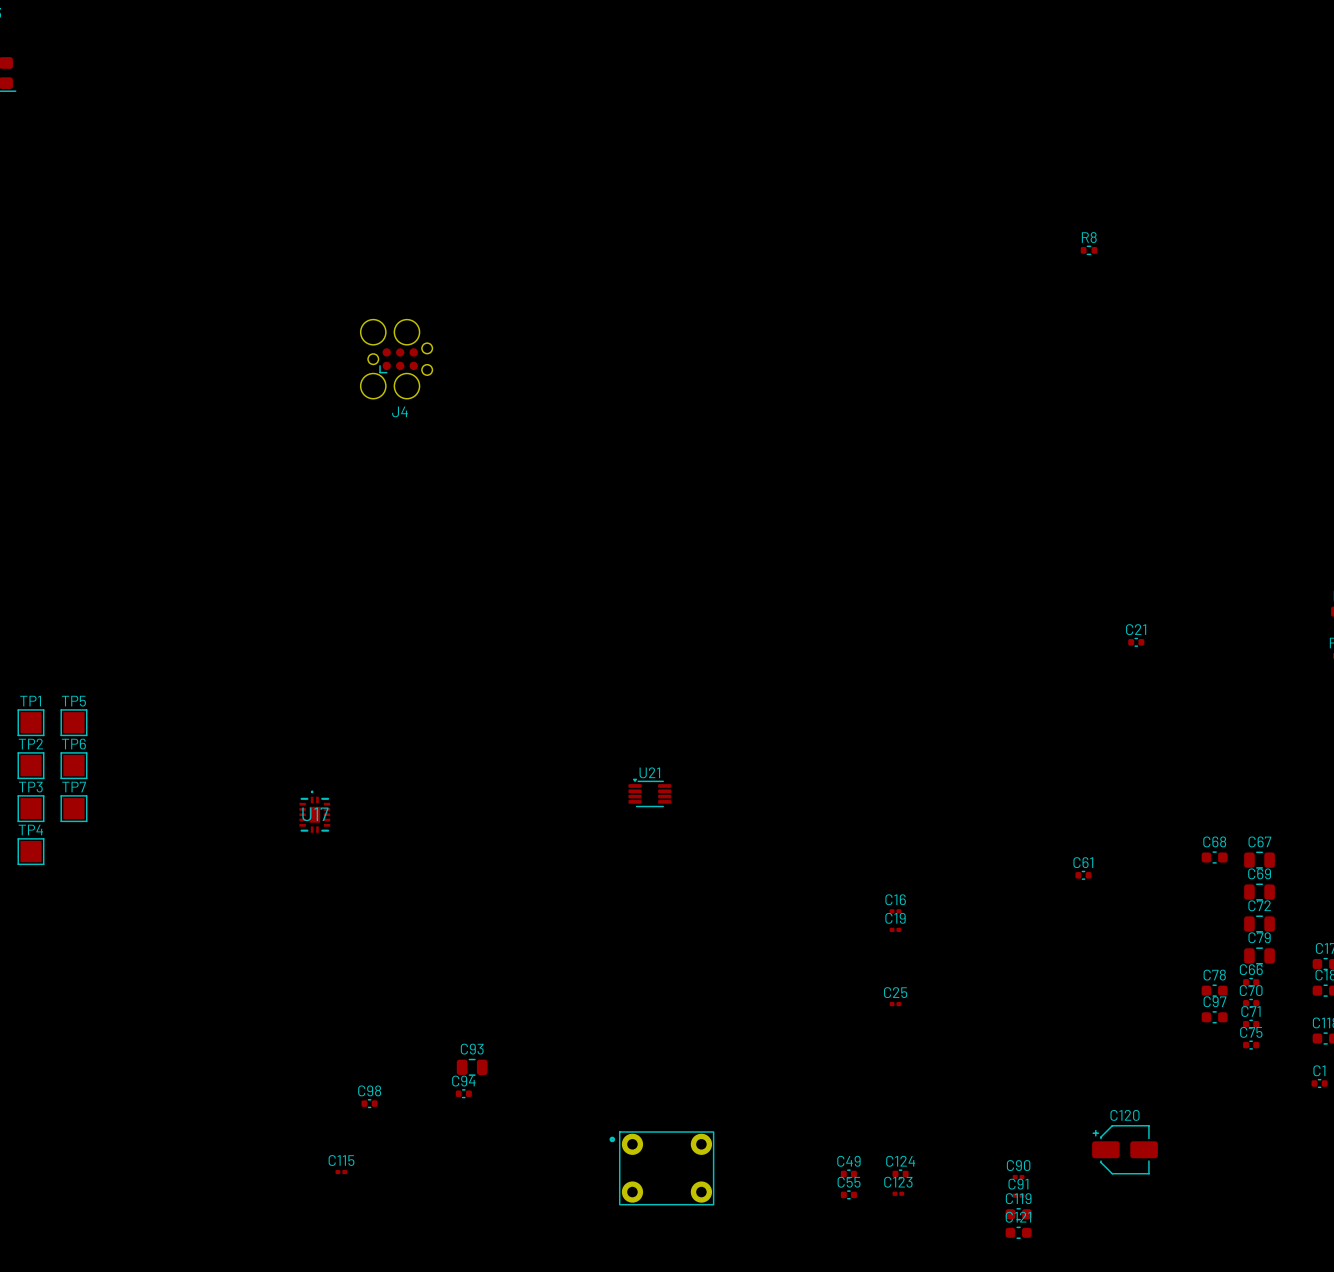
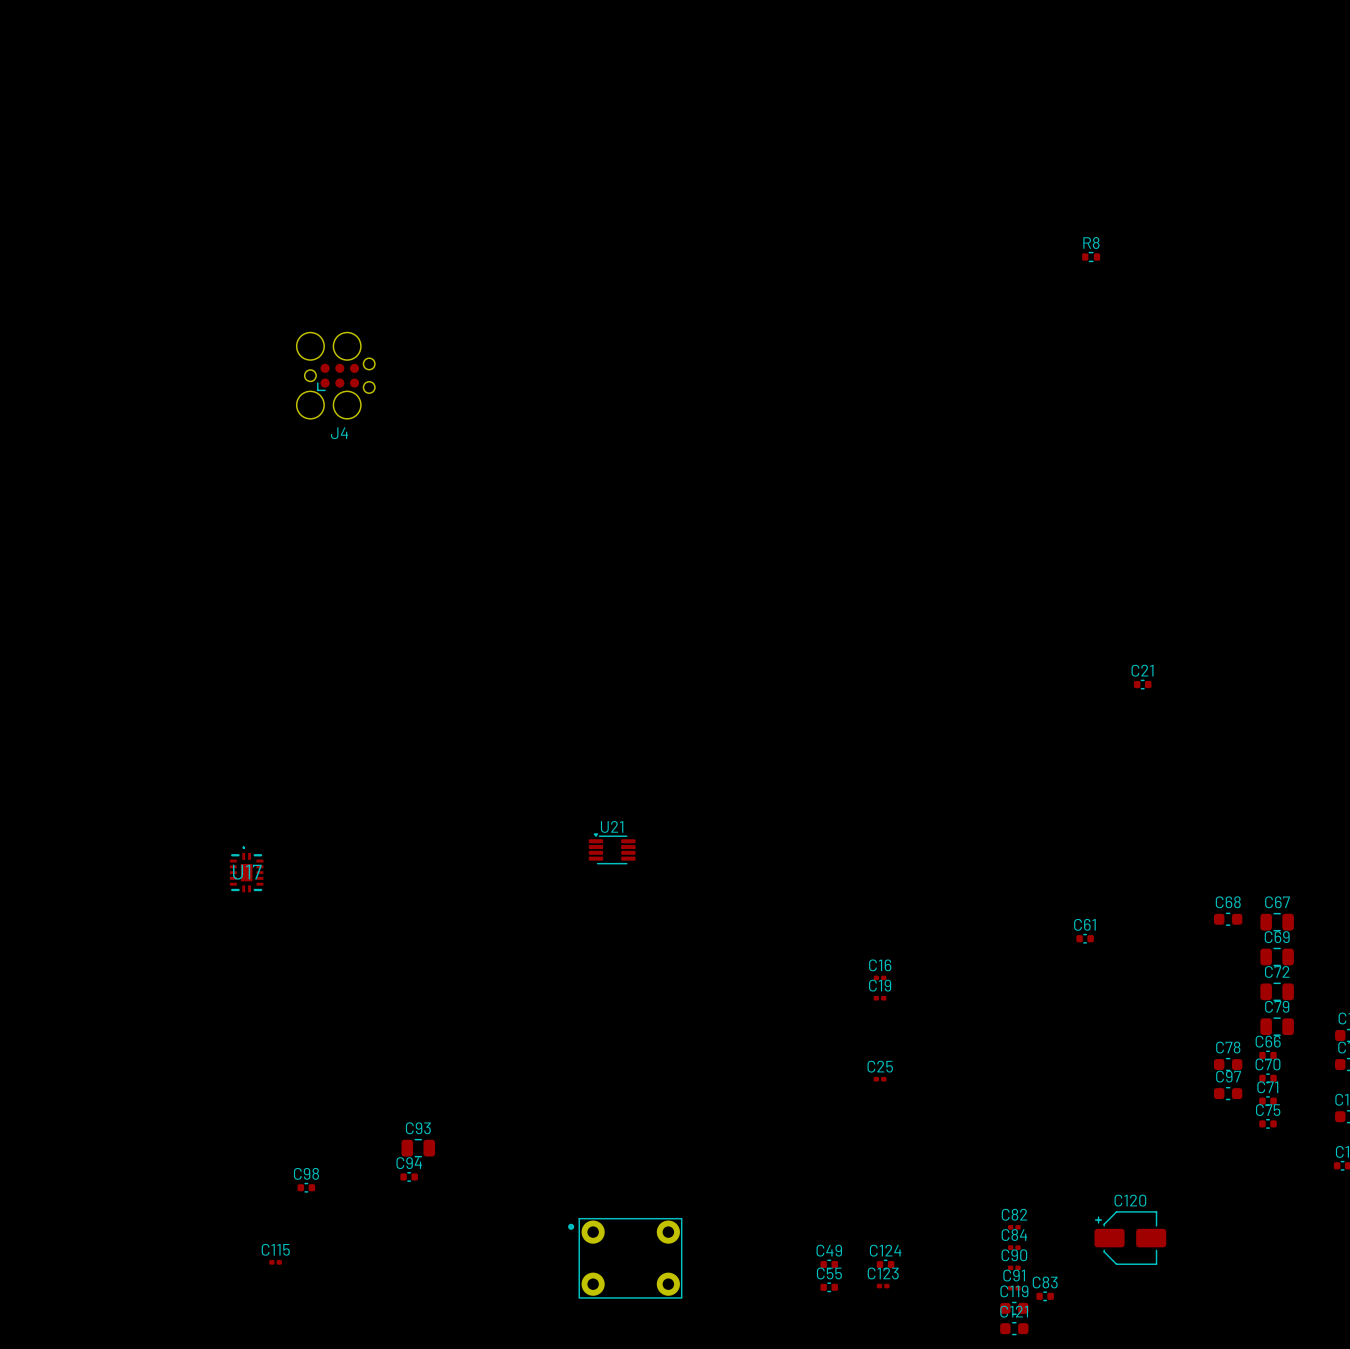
C82: none -> (1014, 1227)
C84: none -> (1014, 1247)
C83: none -> (1045, 1296)

